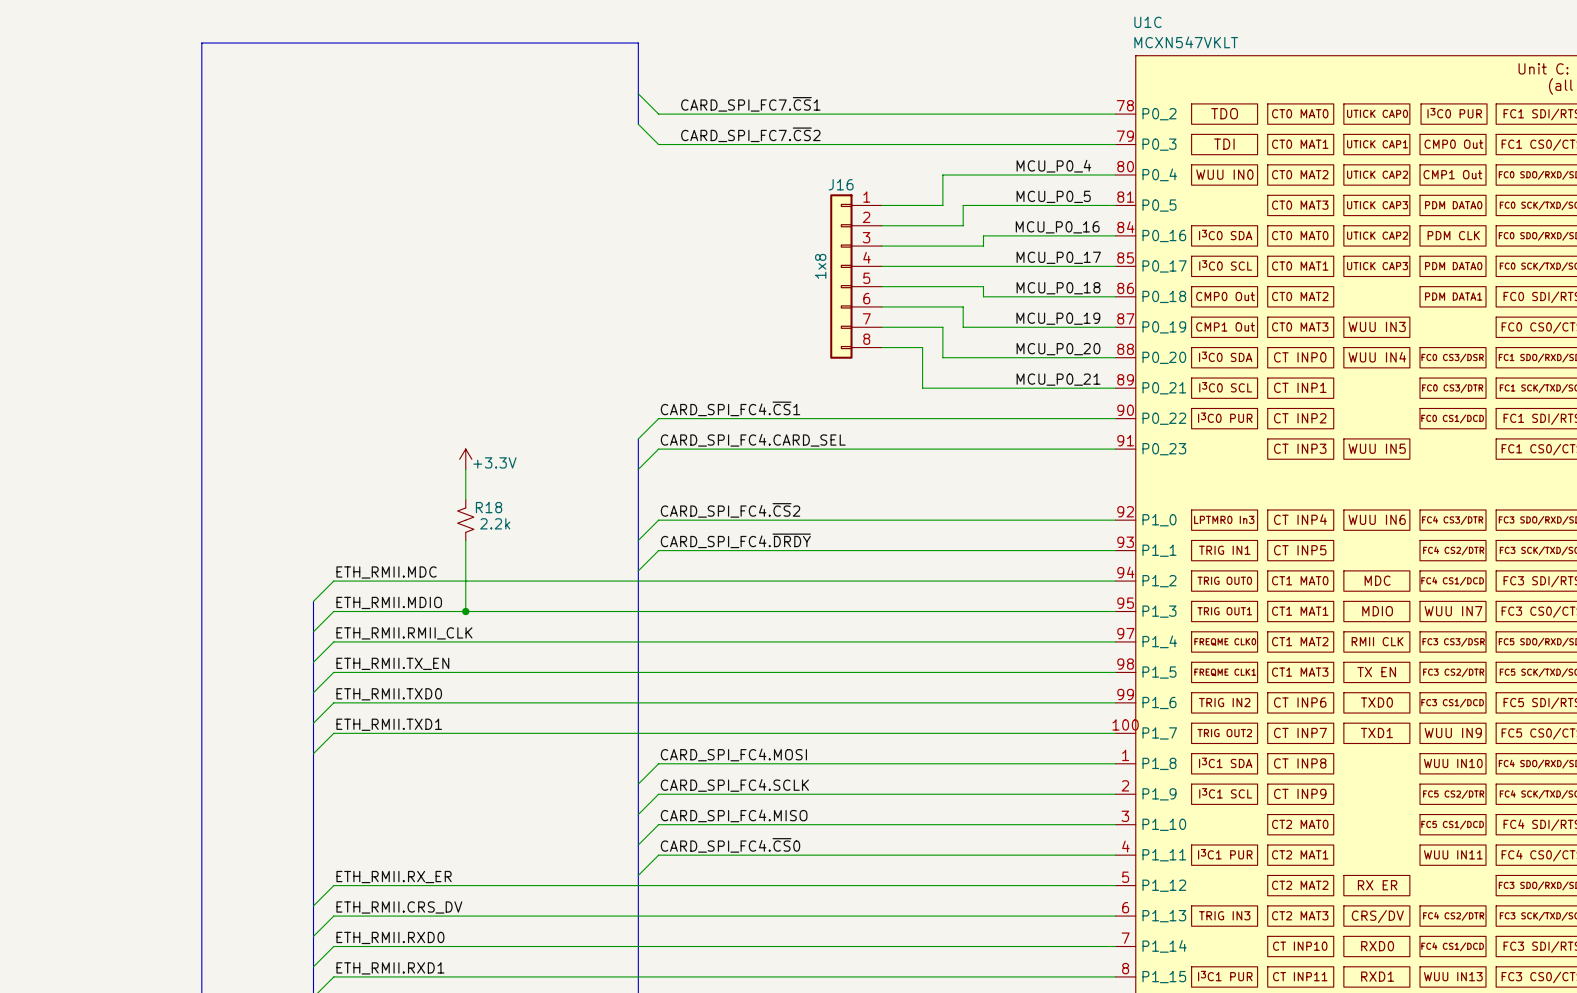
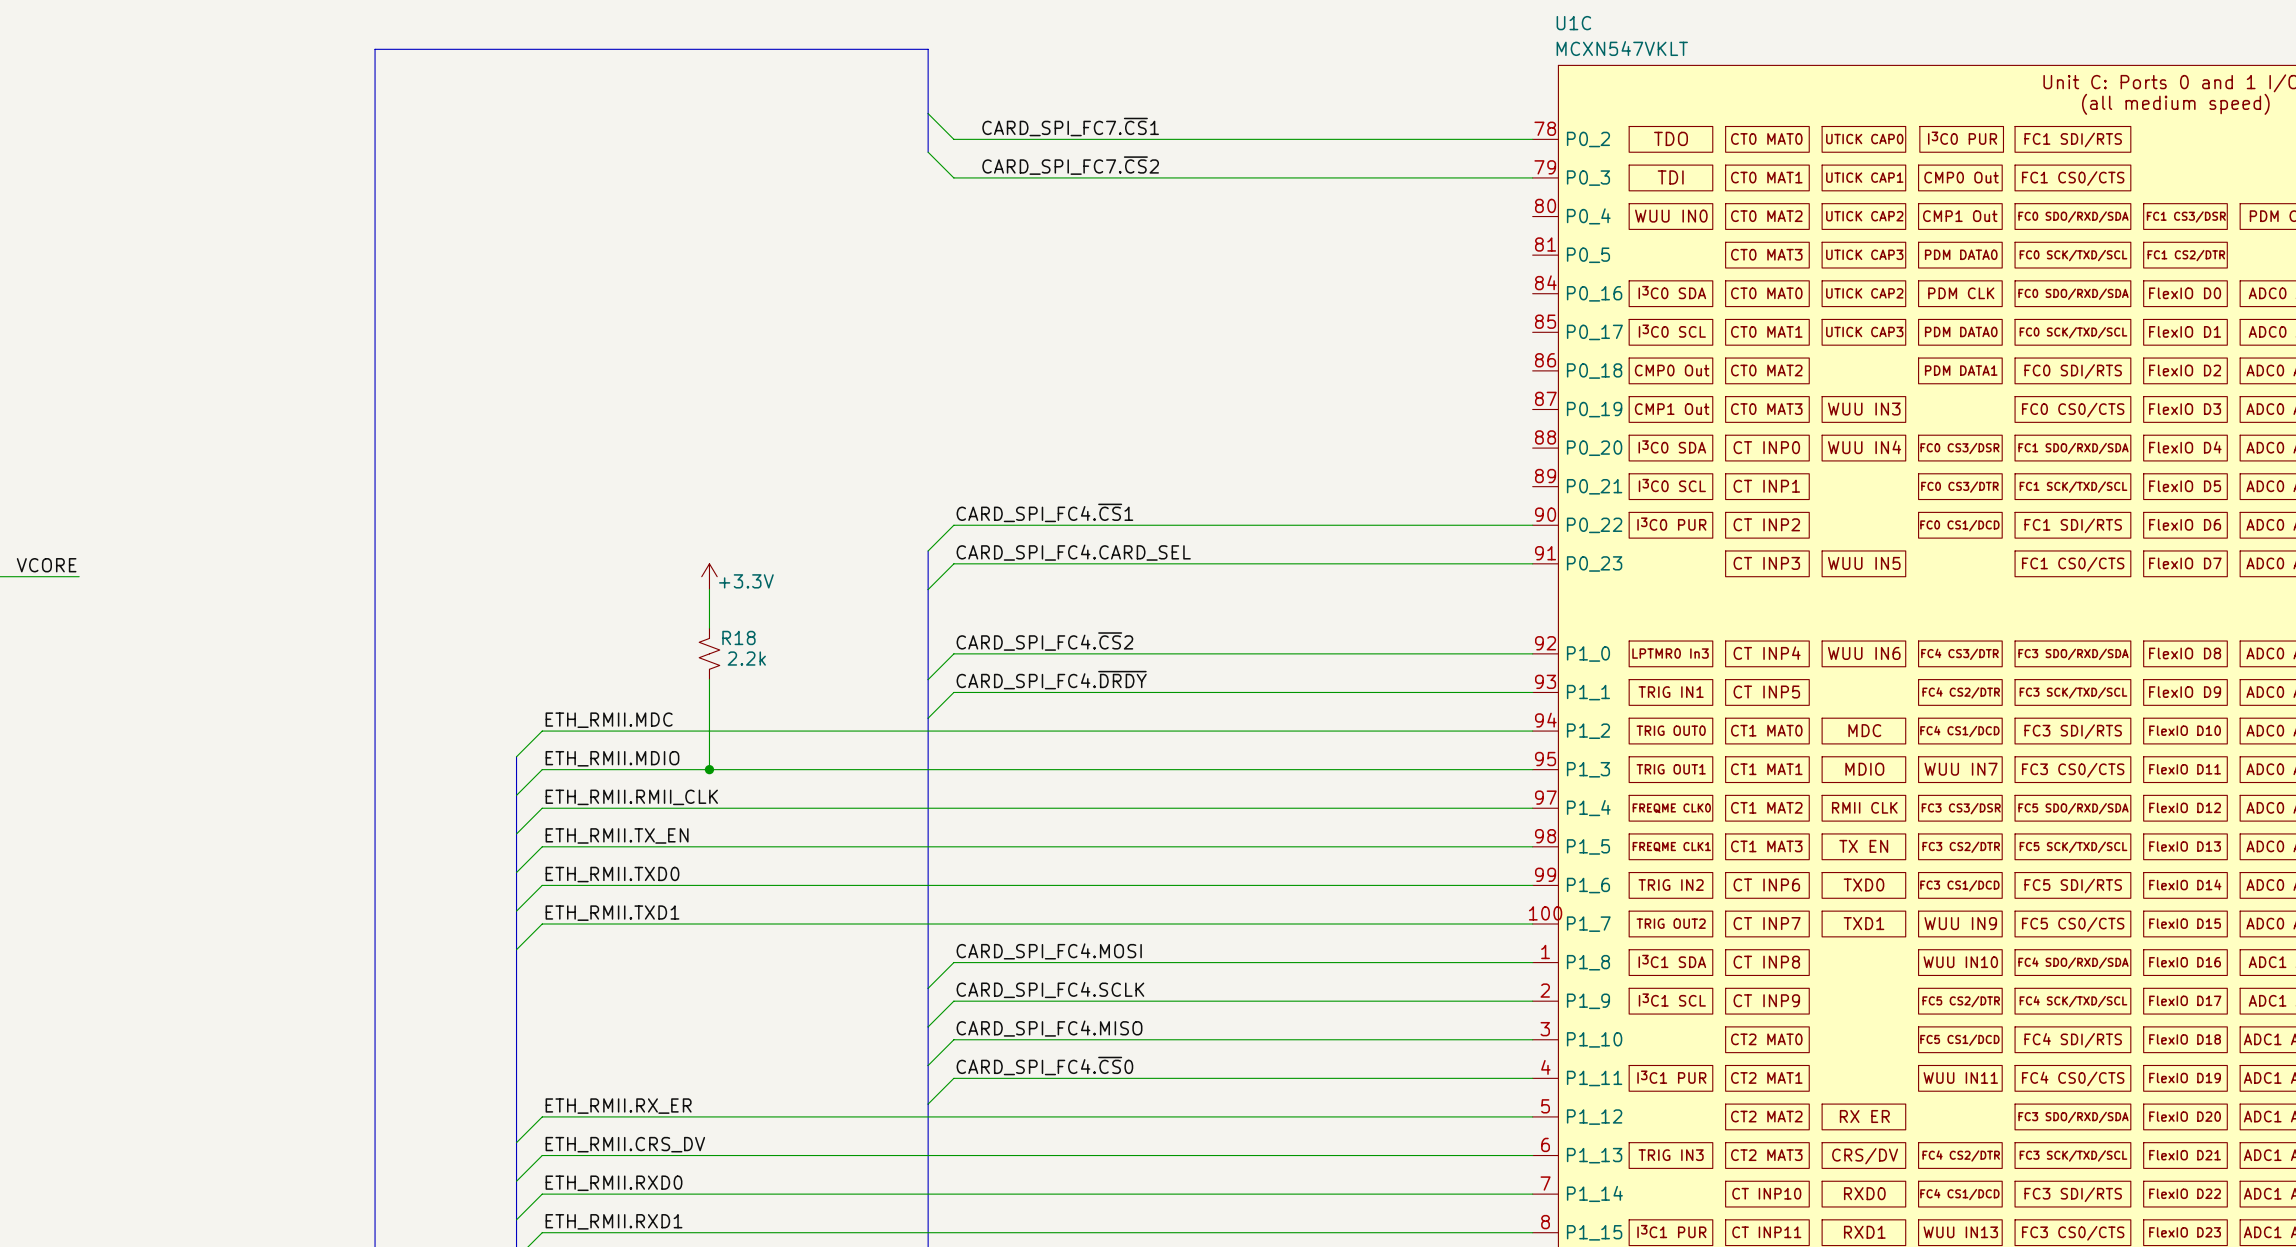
label: MCU_P0_4 (1053, 166) -> none
wire: (1115, 174) (942, 174) (942, 205) (881, 205) -> none
label: MCU_P0_5 (1053, 196) -> none
wire: (1115, 205) (963, 205) (963, 225) (881, 225) -> none
label: MCU_P0_16 (1057, 227) -> none
wire: (1115, 235) (983, 235) (983, 246) (881, 246) -> none
label: MCU_P0_17 (1058, 257) -> none
wire: (881, 266) (1115, 266) -> none
J16: 1x8 (856, 276) -> none
wire: (881, 286) (983, 286) (983, 296) (1115, 296) -> none
label: MCU_P0_18 (1058, 288) -> none
wire: (881, 306) (963, 306) (963, 327) (1115, 327) -> none
label: MCU_P0_19 (1058, 318) -> none
wire: (881, 327) (942, 327) (942, 357) (1115, 357) -> none
wire: (881, 347) (922, 347) (922, 388) (1115, 388) -> none
label: MCU_P0_20 (1058, 349) -> none
label: MCU_P0_21 (1058, 379) -> none

